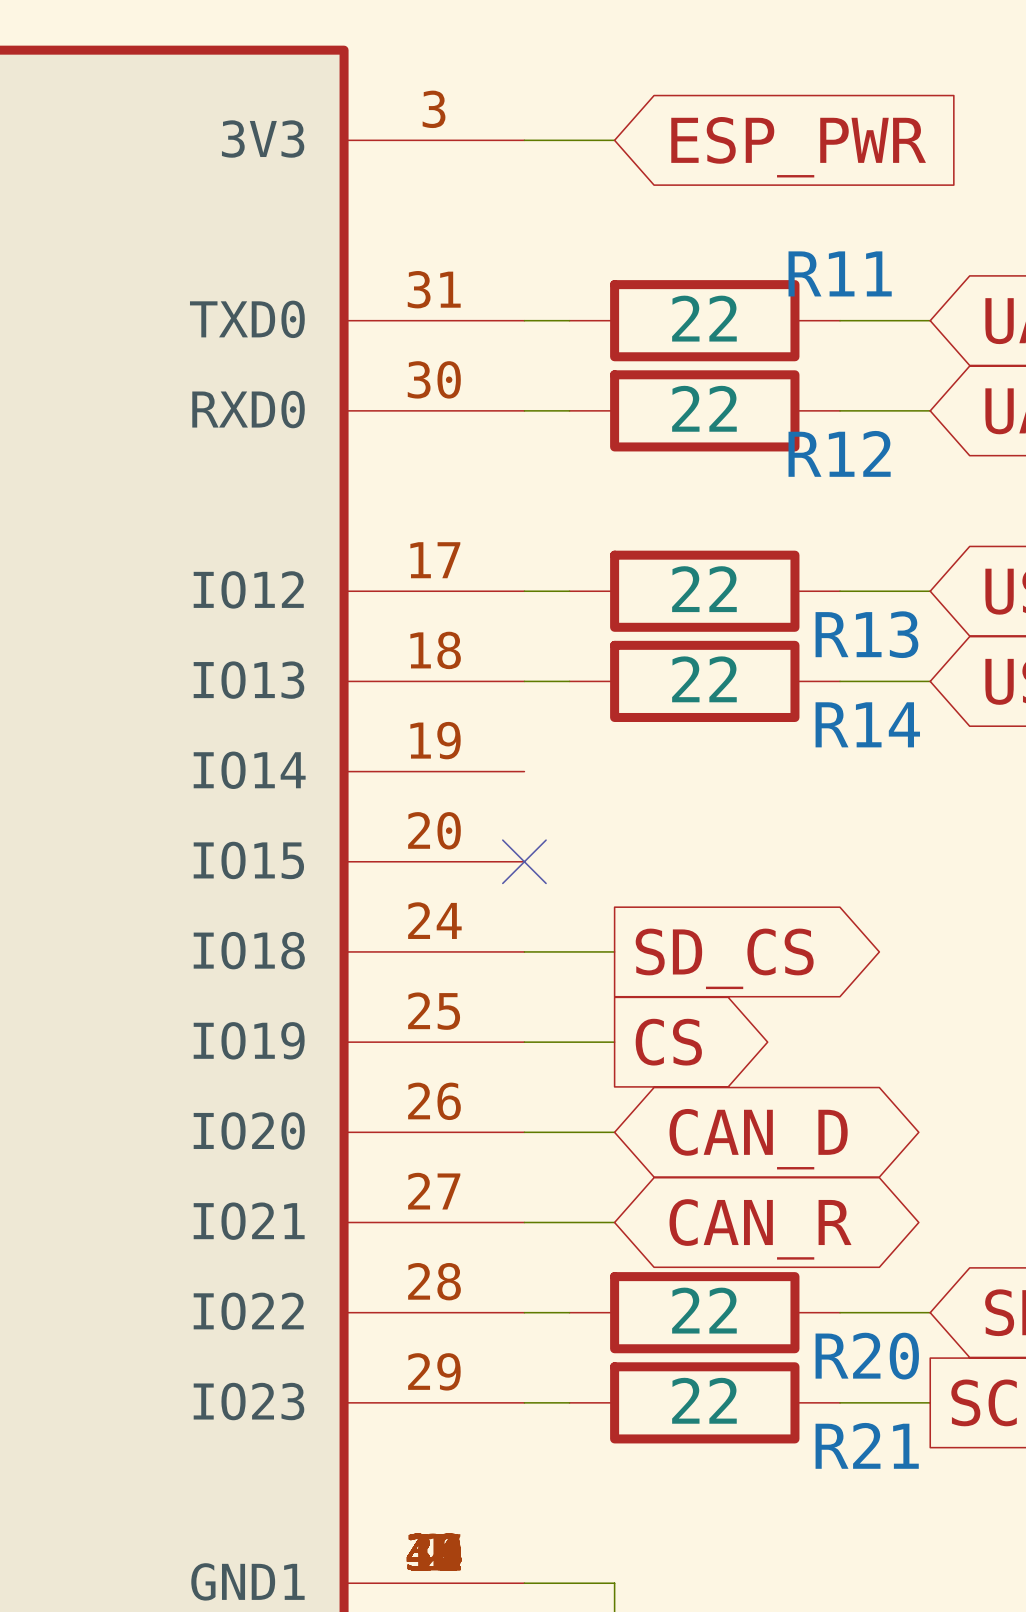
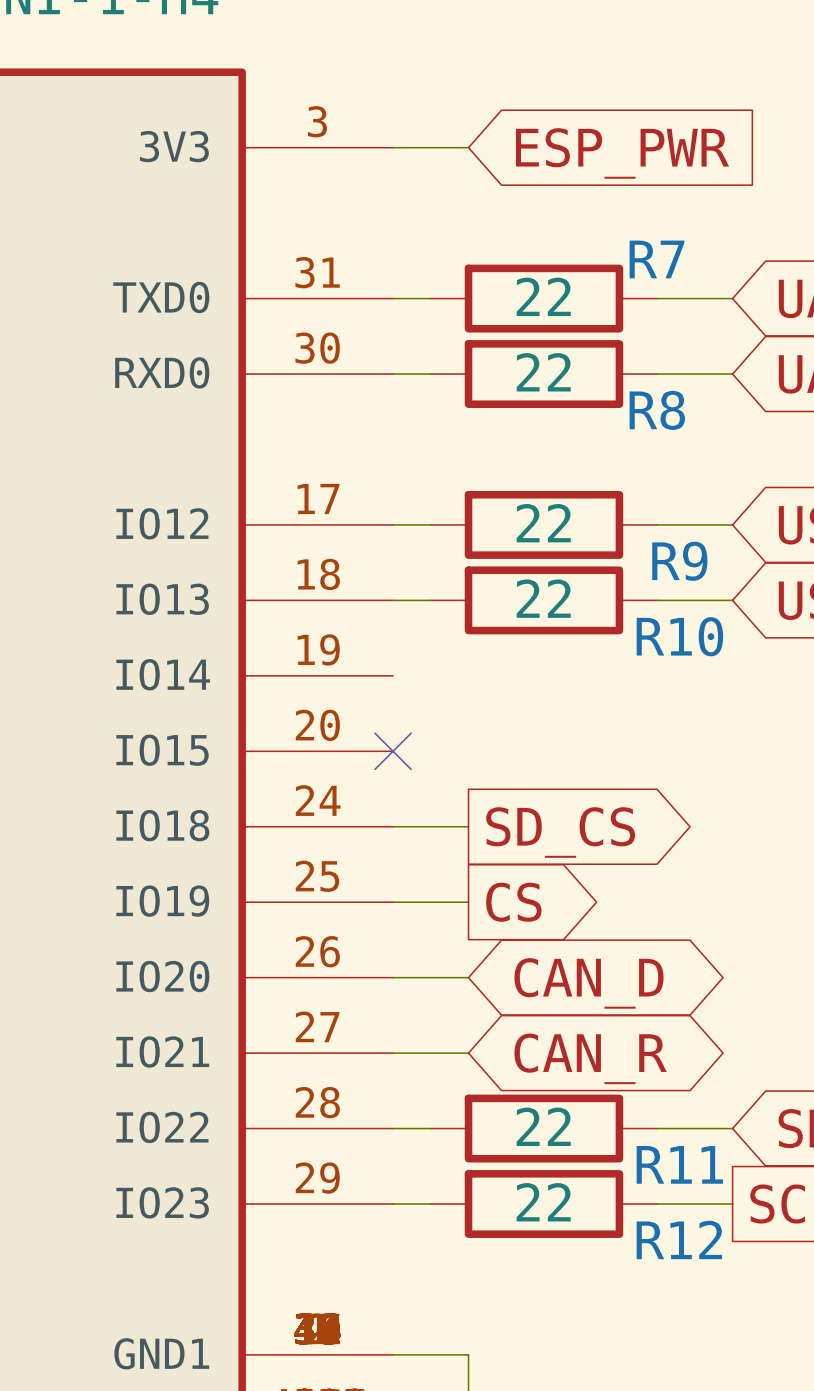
R11 name: R11 (840, 273) -> R7 (657, 259)
R12 name: R12 (839, 453) -> R8 (657, 410)
R13 name: R13 (866, 634) -> R9 (679, 561)
R14 name: R14 (867, 724) -> R10 (679, 636)
R20 name: R20 (867, 1356) -> R11 (679, 1164)
R21 name: R21 (867, 1445) -> R12 (679, 1239)

